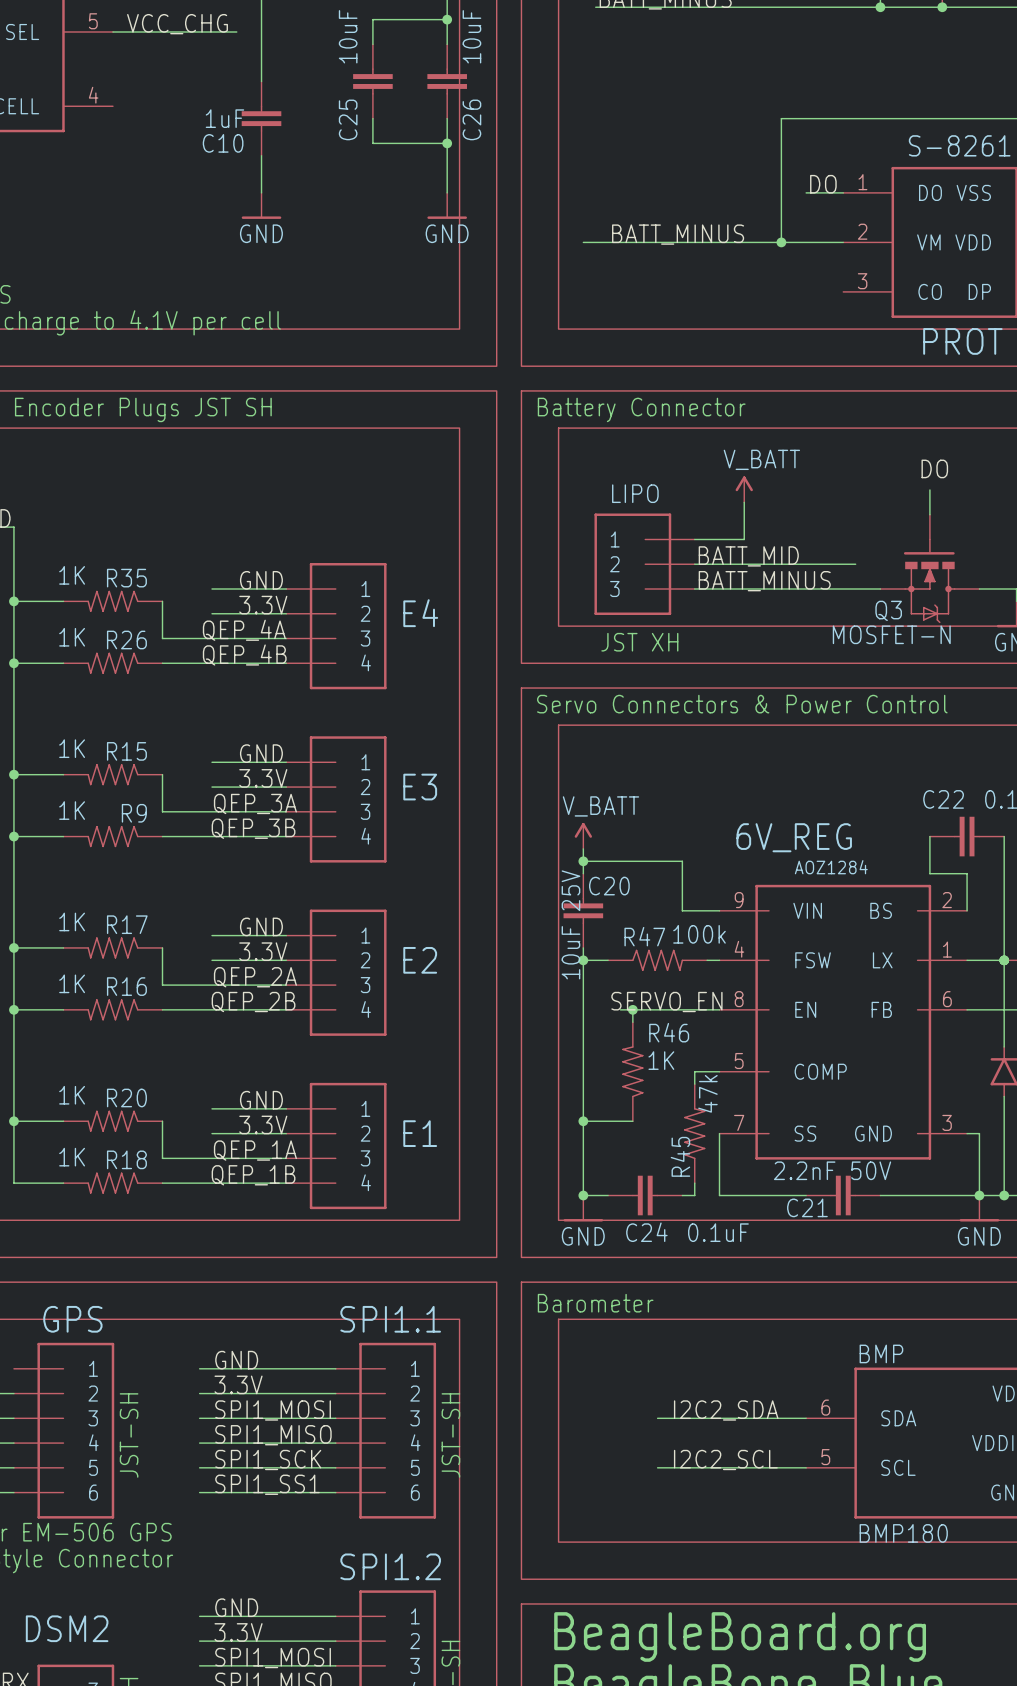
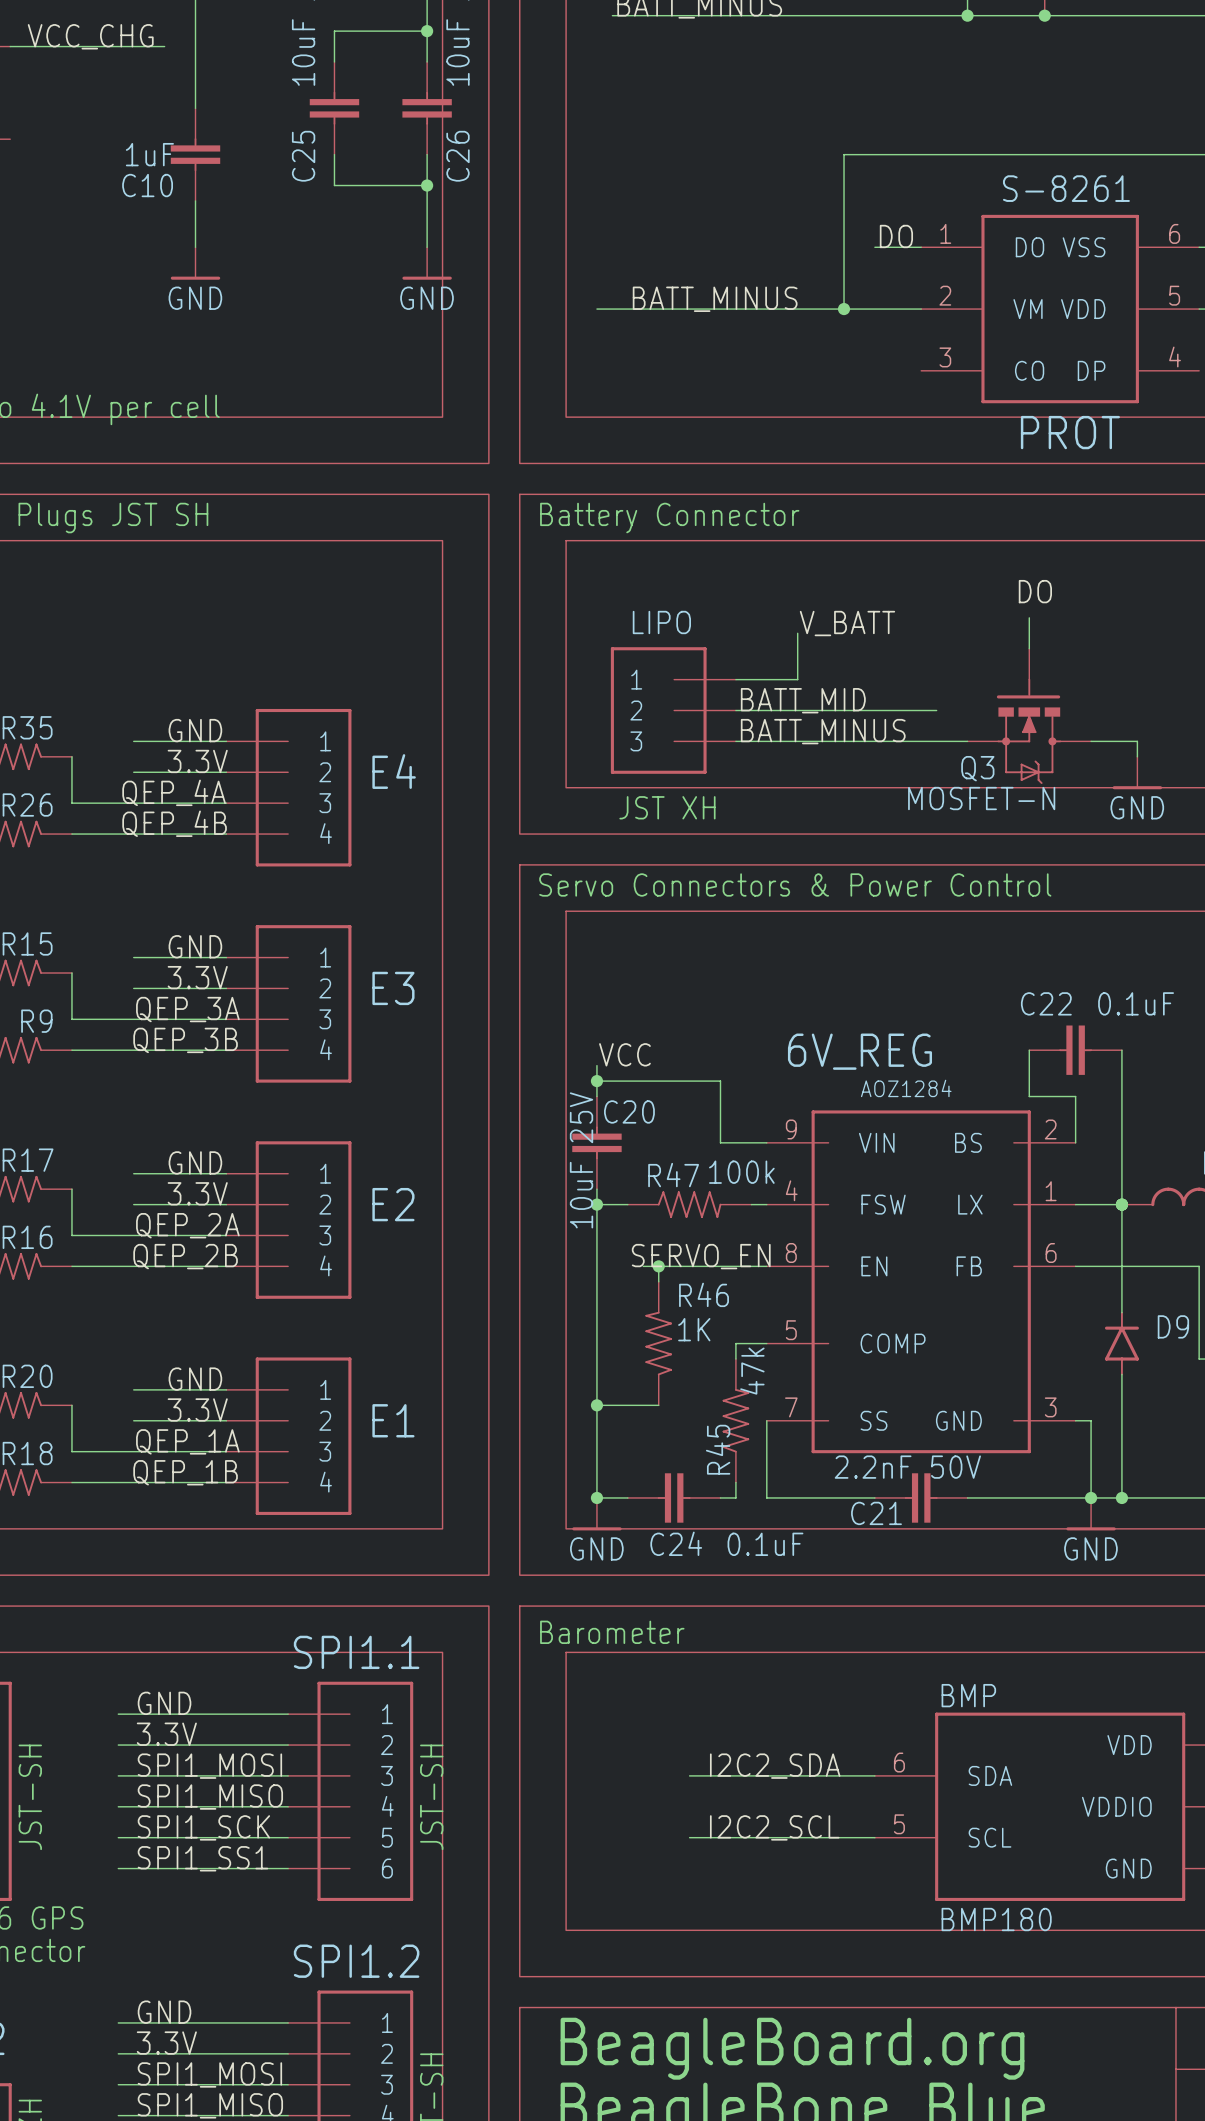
power symbol: V_BATT (744, 489) -> none
label: none -> V_BATT (847, 623)
power symbol: V_BATT (583, 835) -> none
label: none -> VCC (624, 1054)

